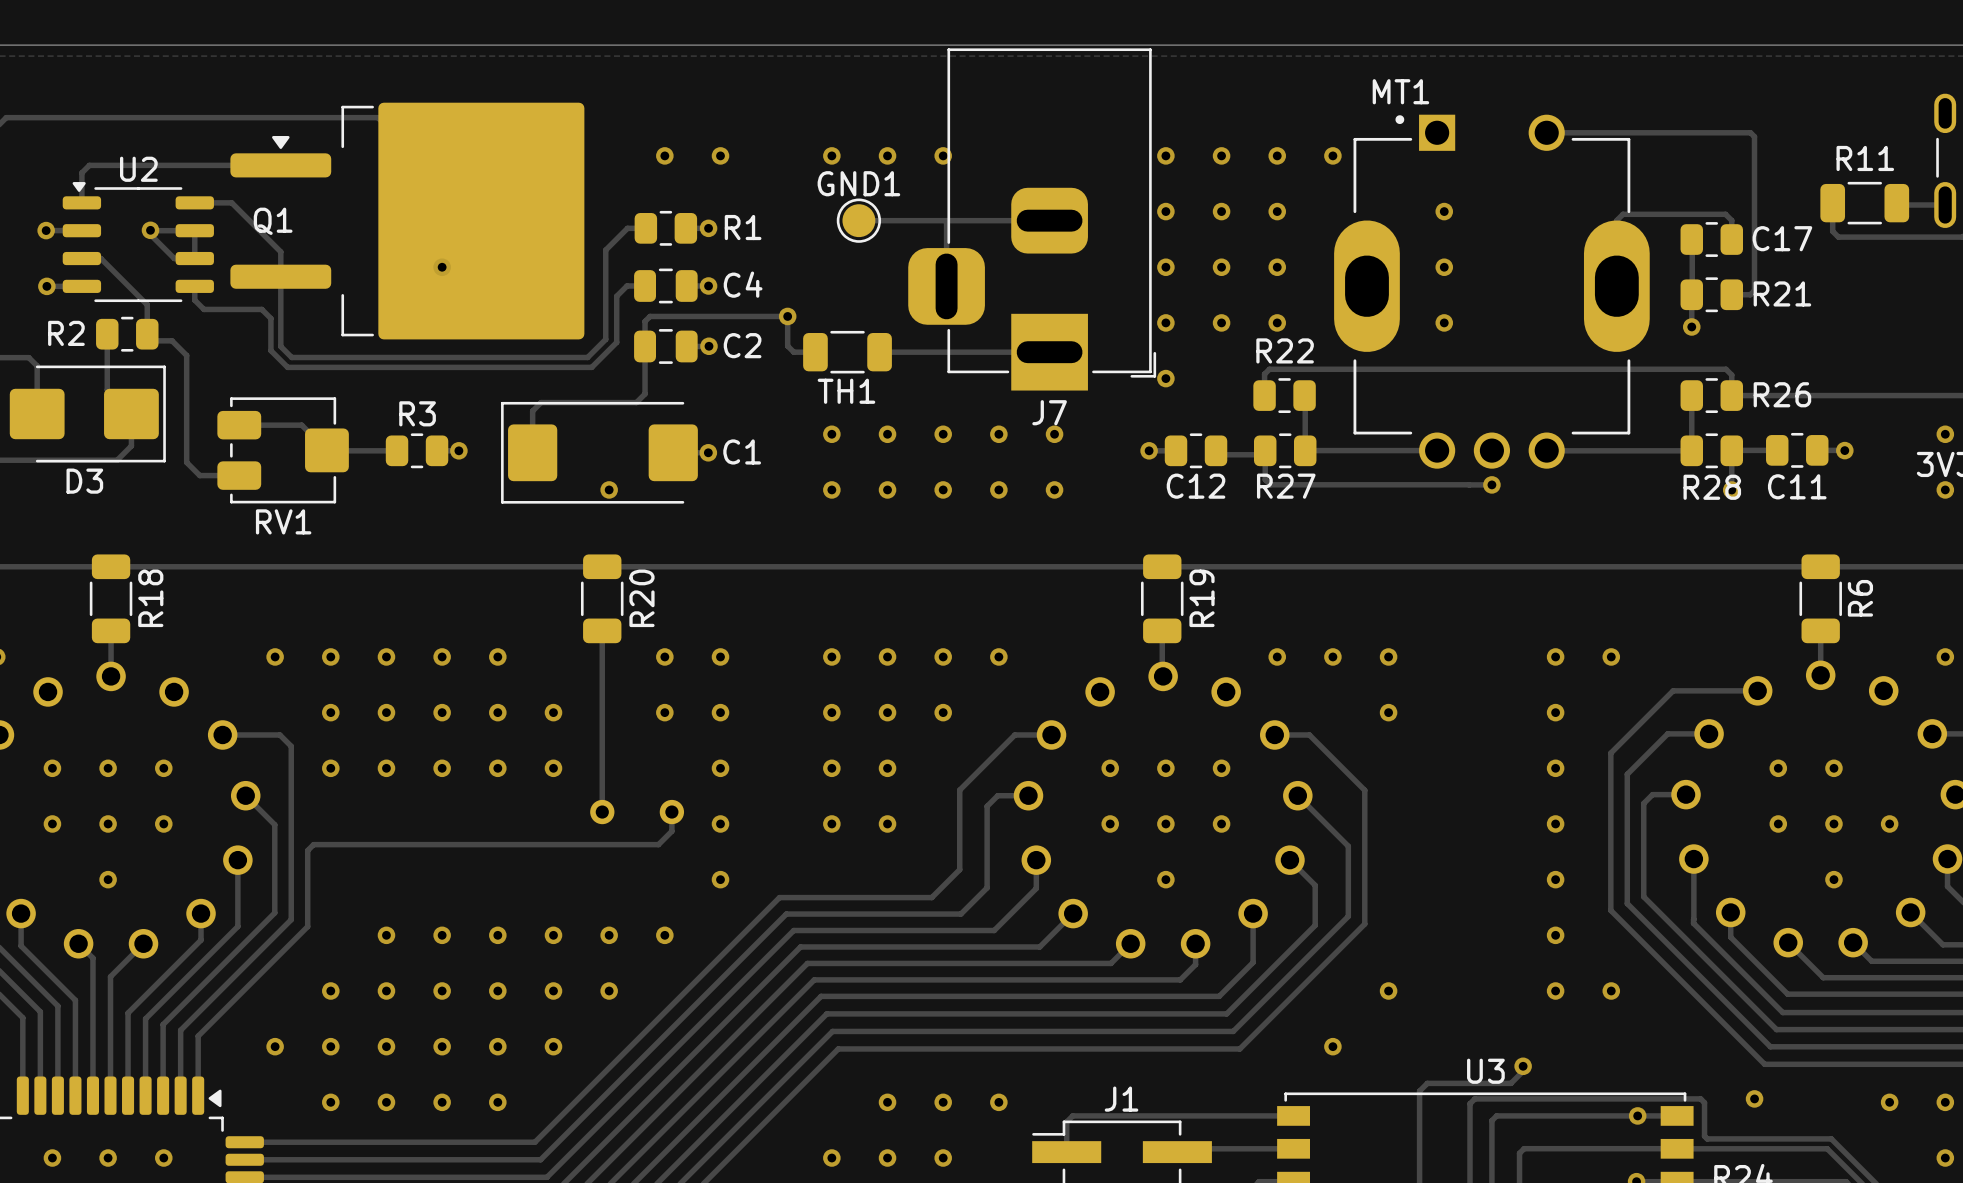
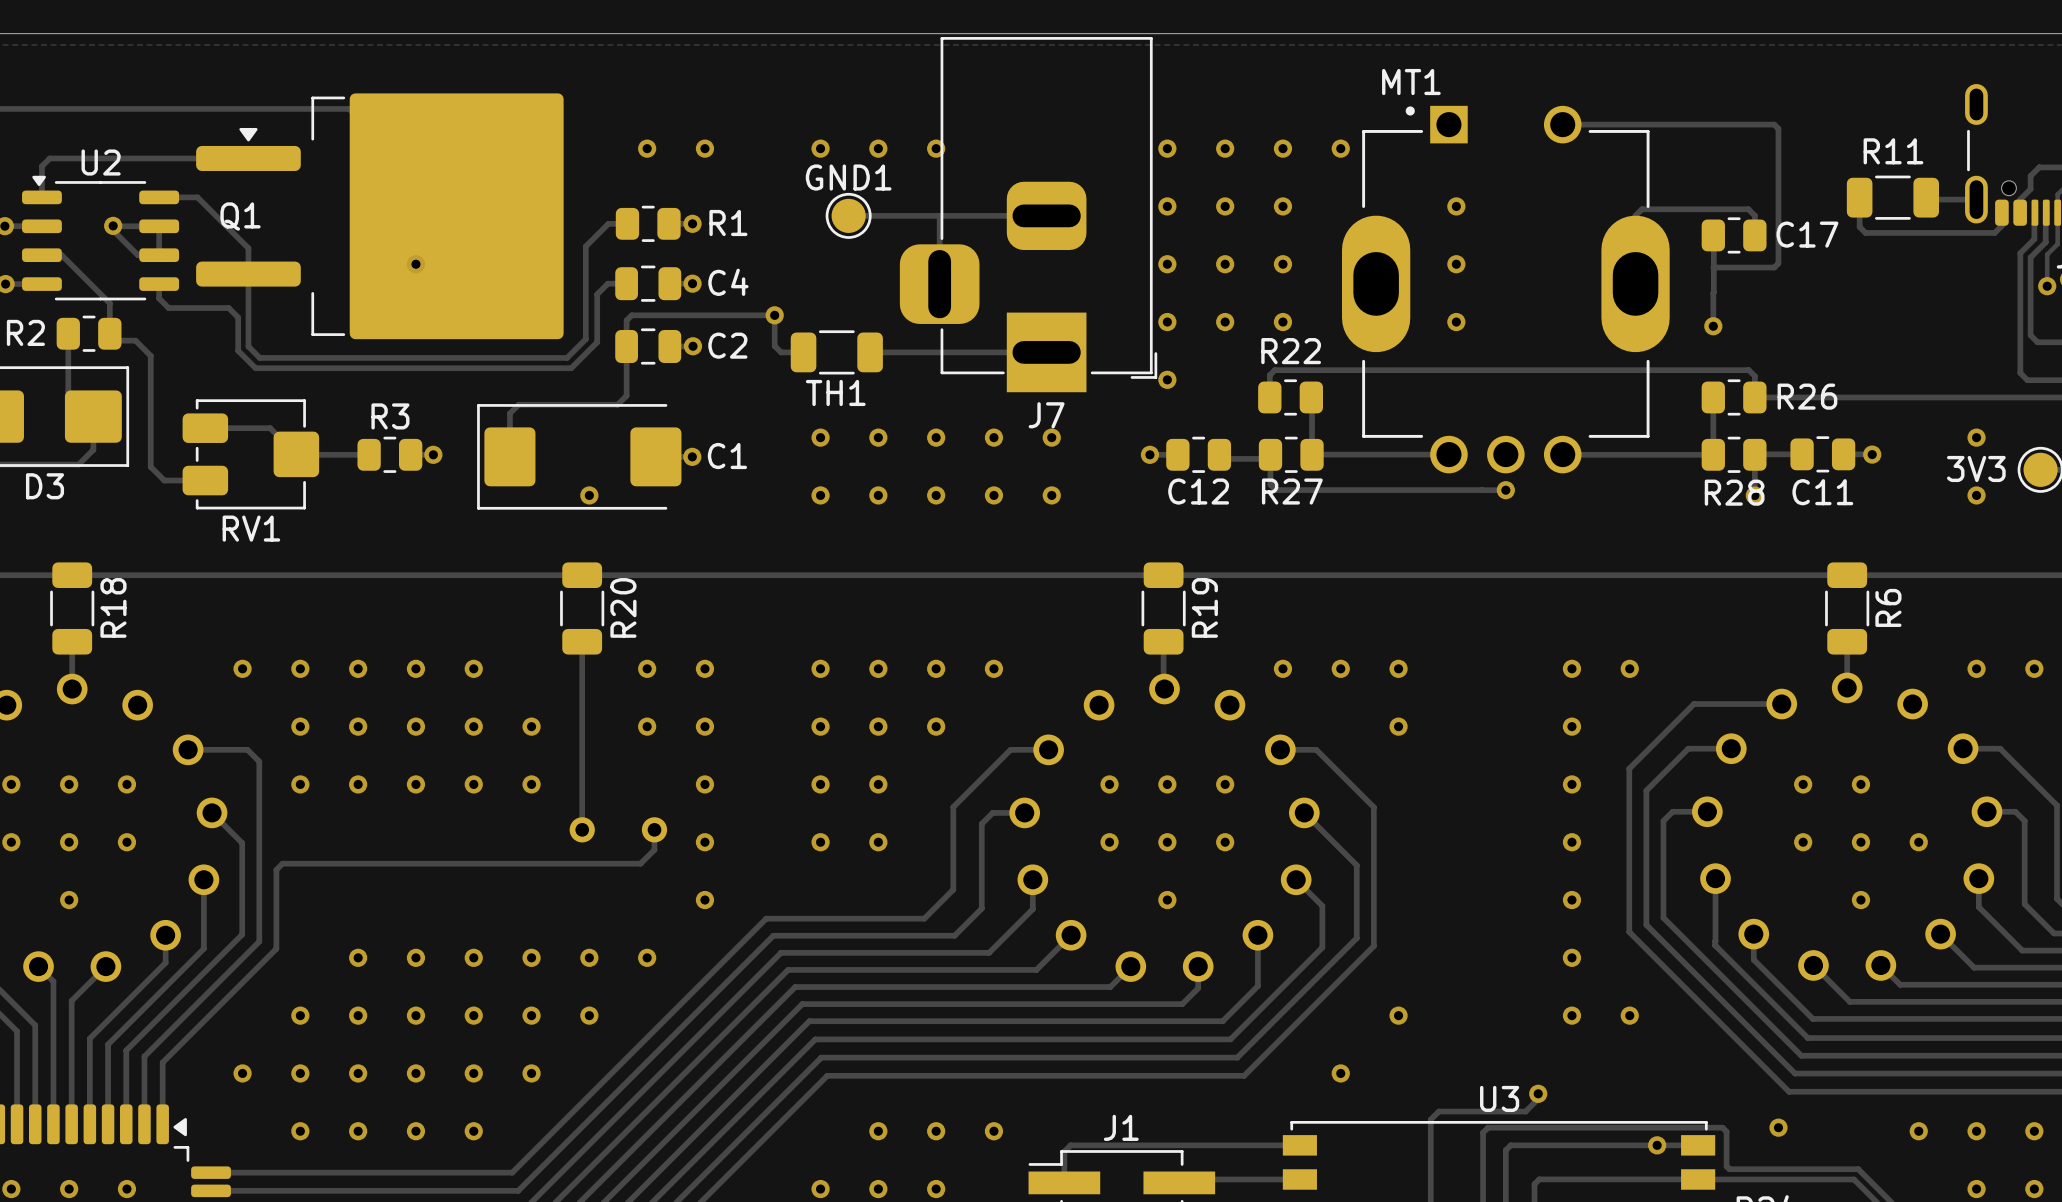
track: (1754, 266) (1754, 290) (1750, 294) (1731, 294) -> (1778, 263) (1774, 267) (1713, 267)
R21: (1711, 294) -> none

